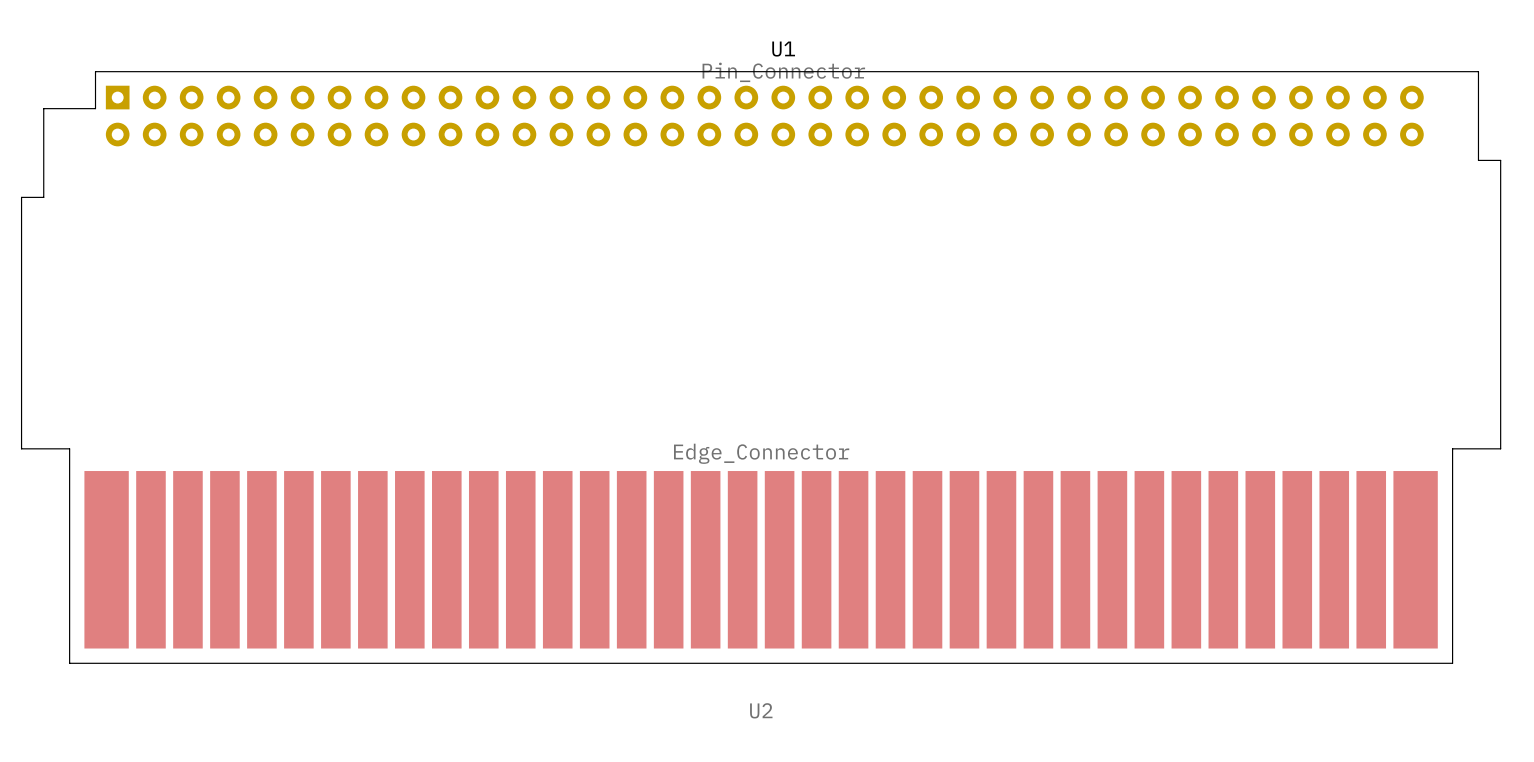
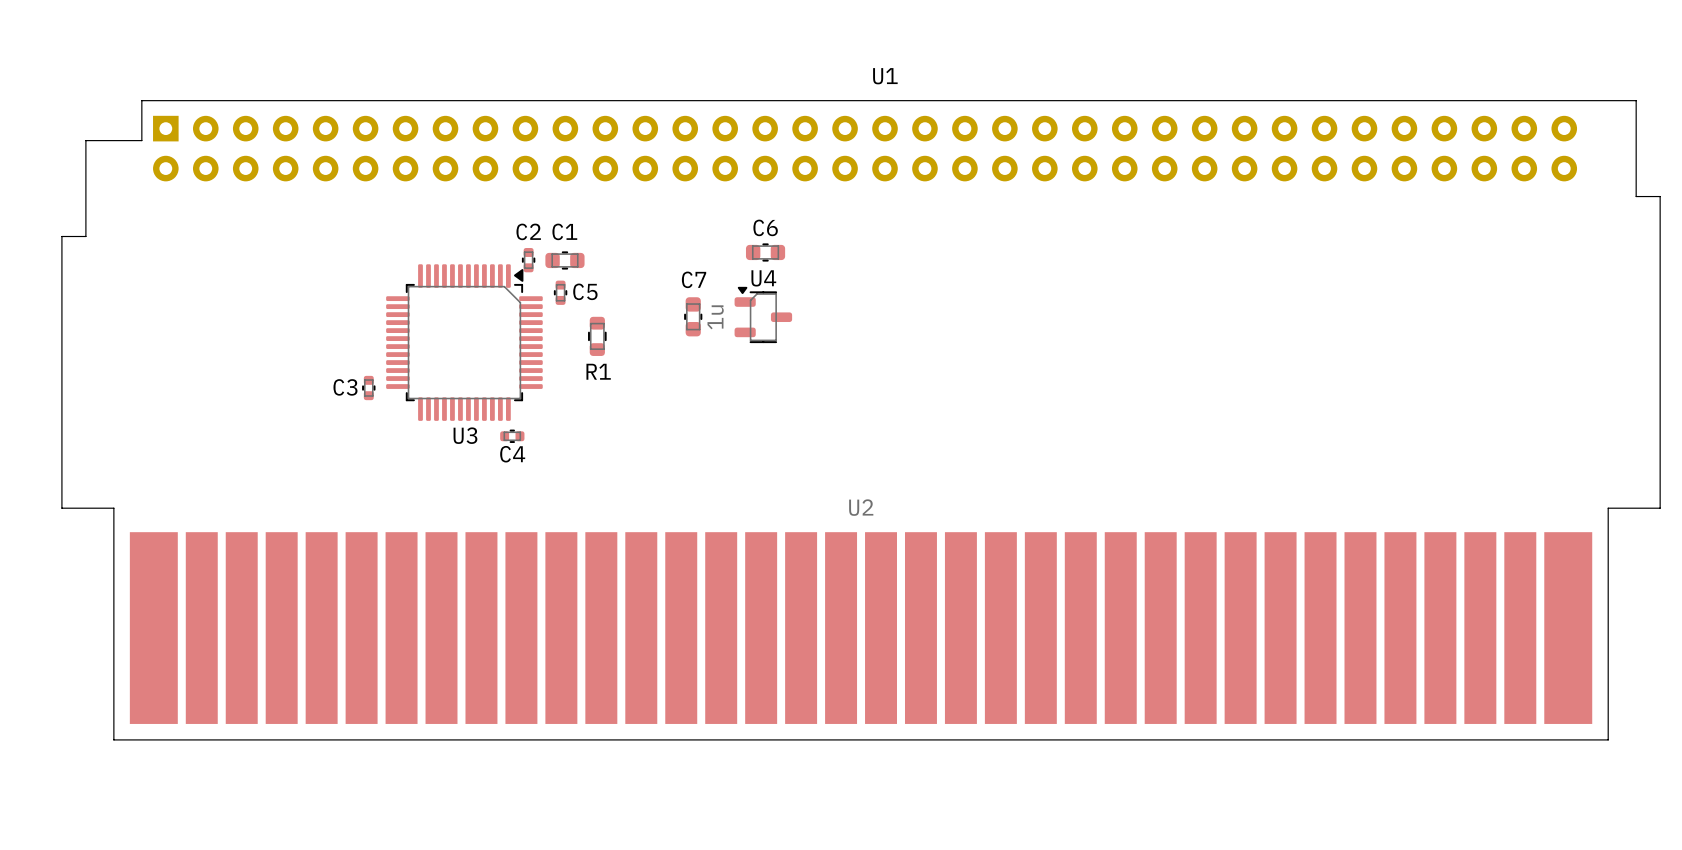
U1 value: Pin_Connector (783, 72) -> none
C6: none -> (765, 252)
C2: none -> (528, 260)
C1: none -> (564, 260)
C5: none -> (560, 292)
U4: none -> (763, 314)
C7: none -> 1u (693, 316)
R1: none -> (597, 336)
U3: none -> (464, 342)
C3: none -> (368, 388)
C4: none -> (512, 436)
U2 value: Edge_Connector (761, 453) -> none
U2 name position: U2 (761, 710) -> U2 (861, 507)

